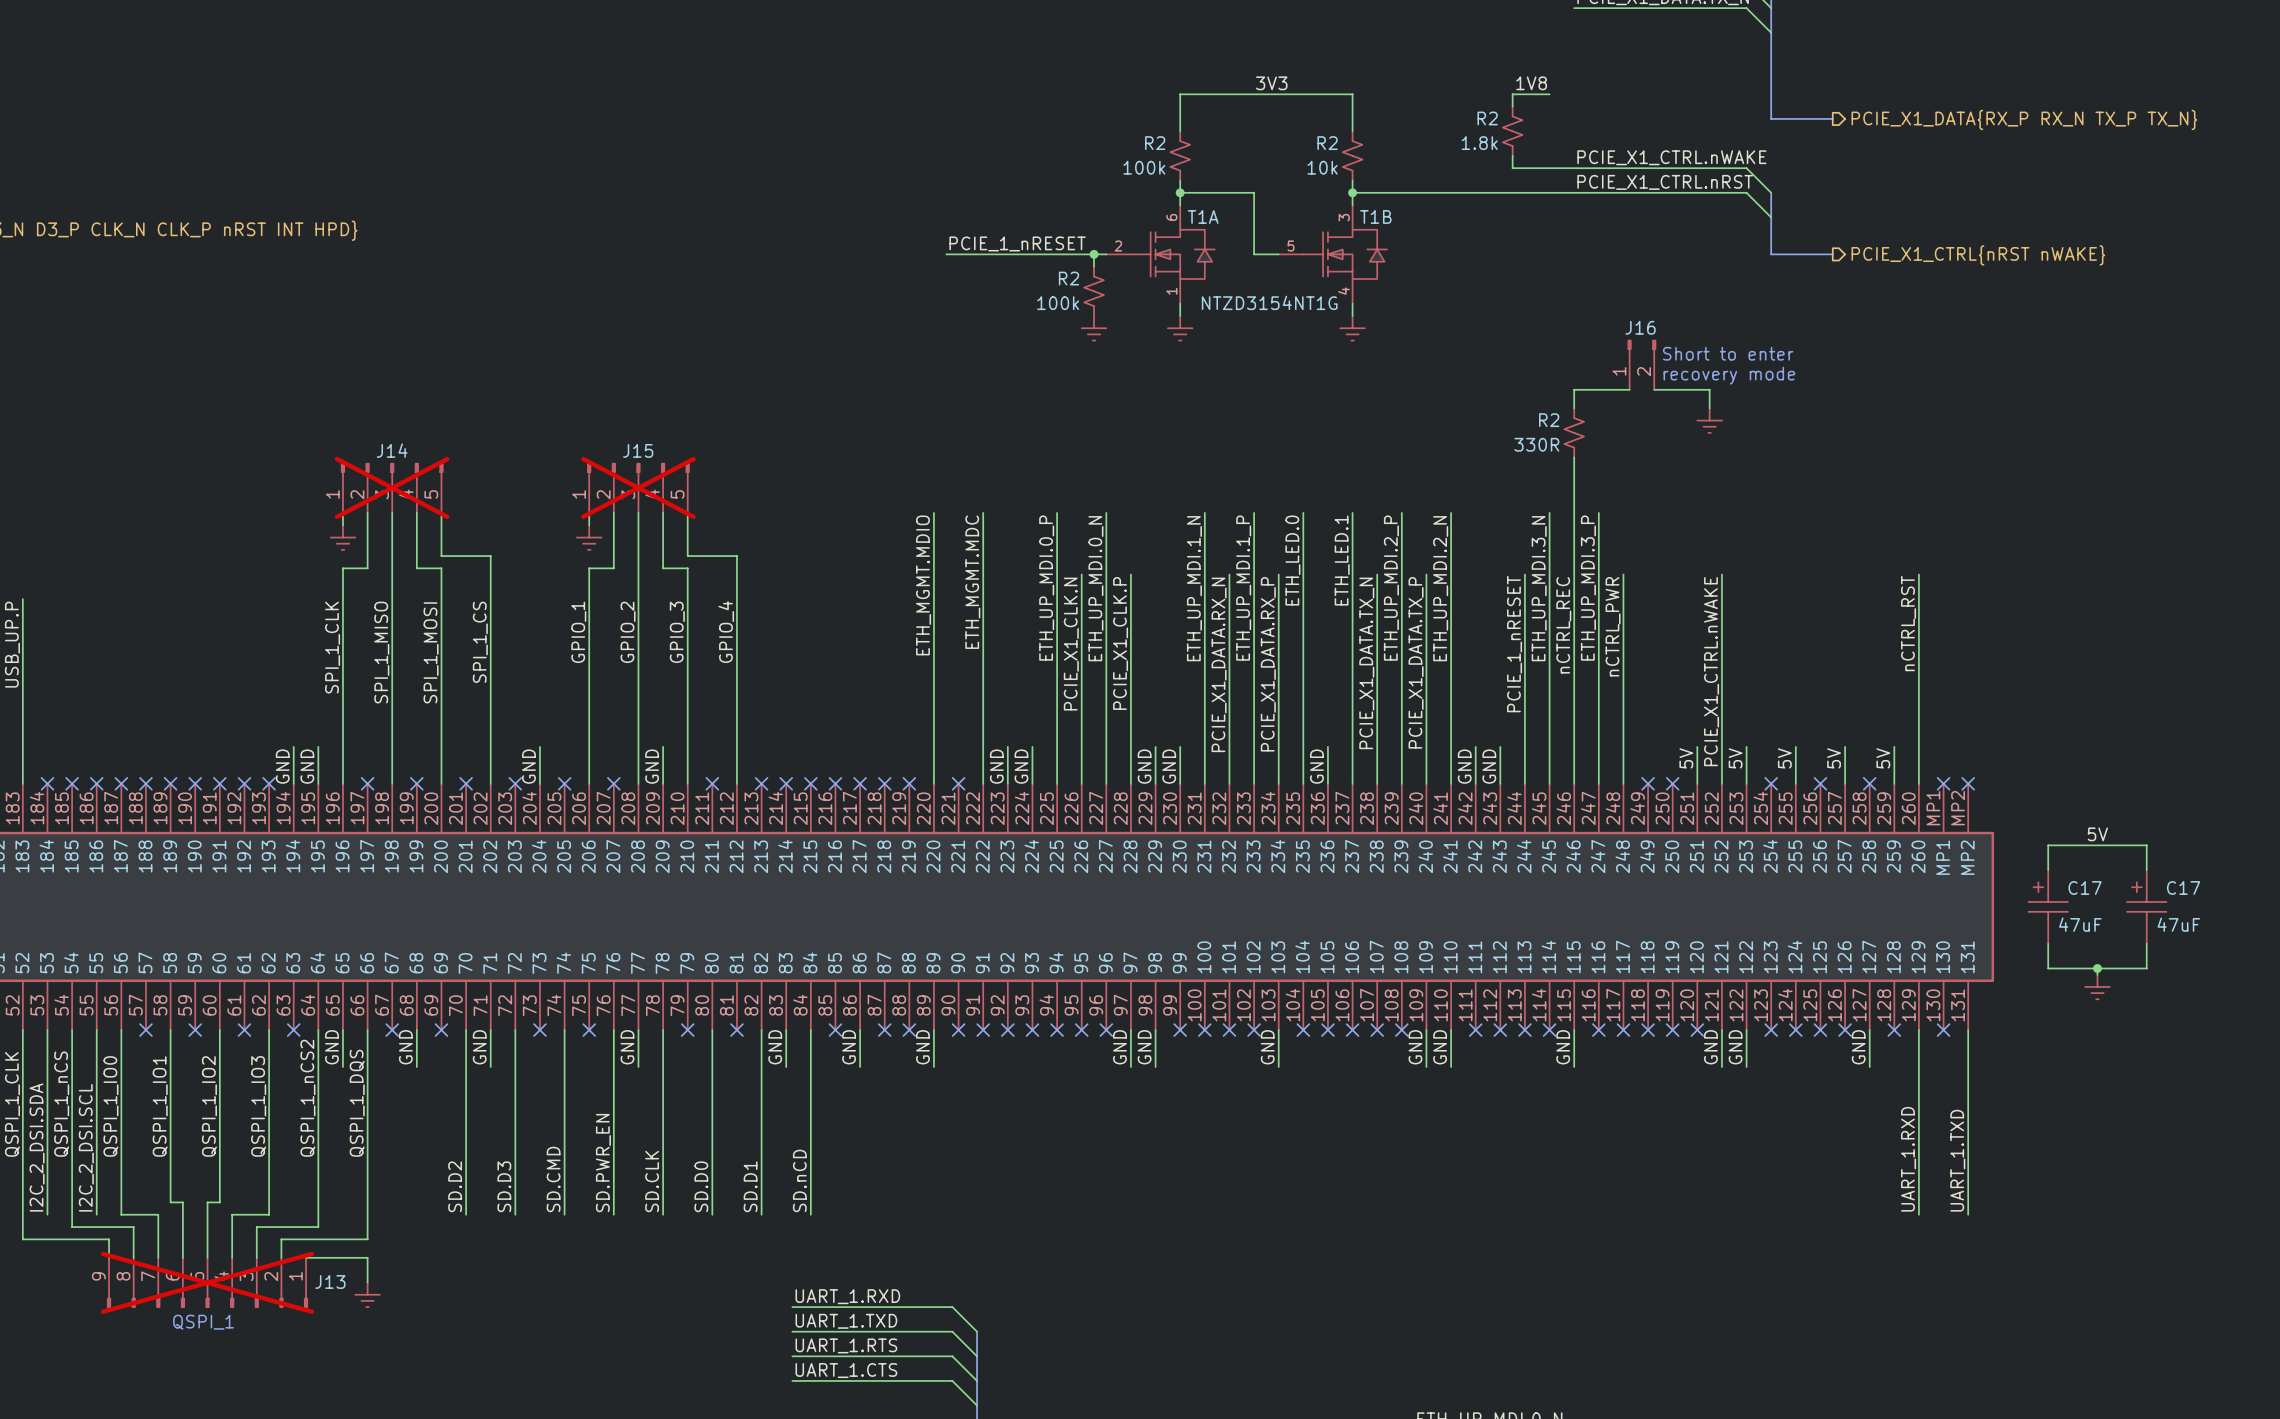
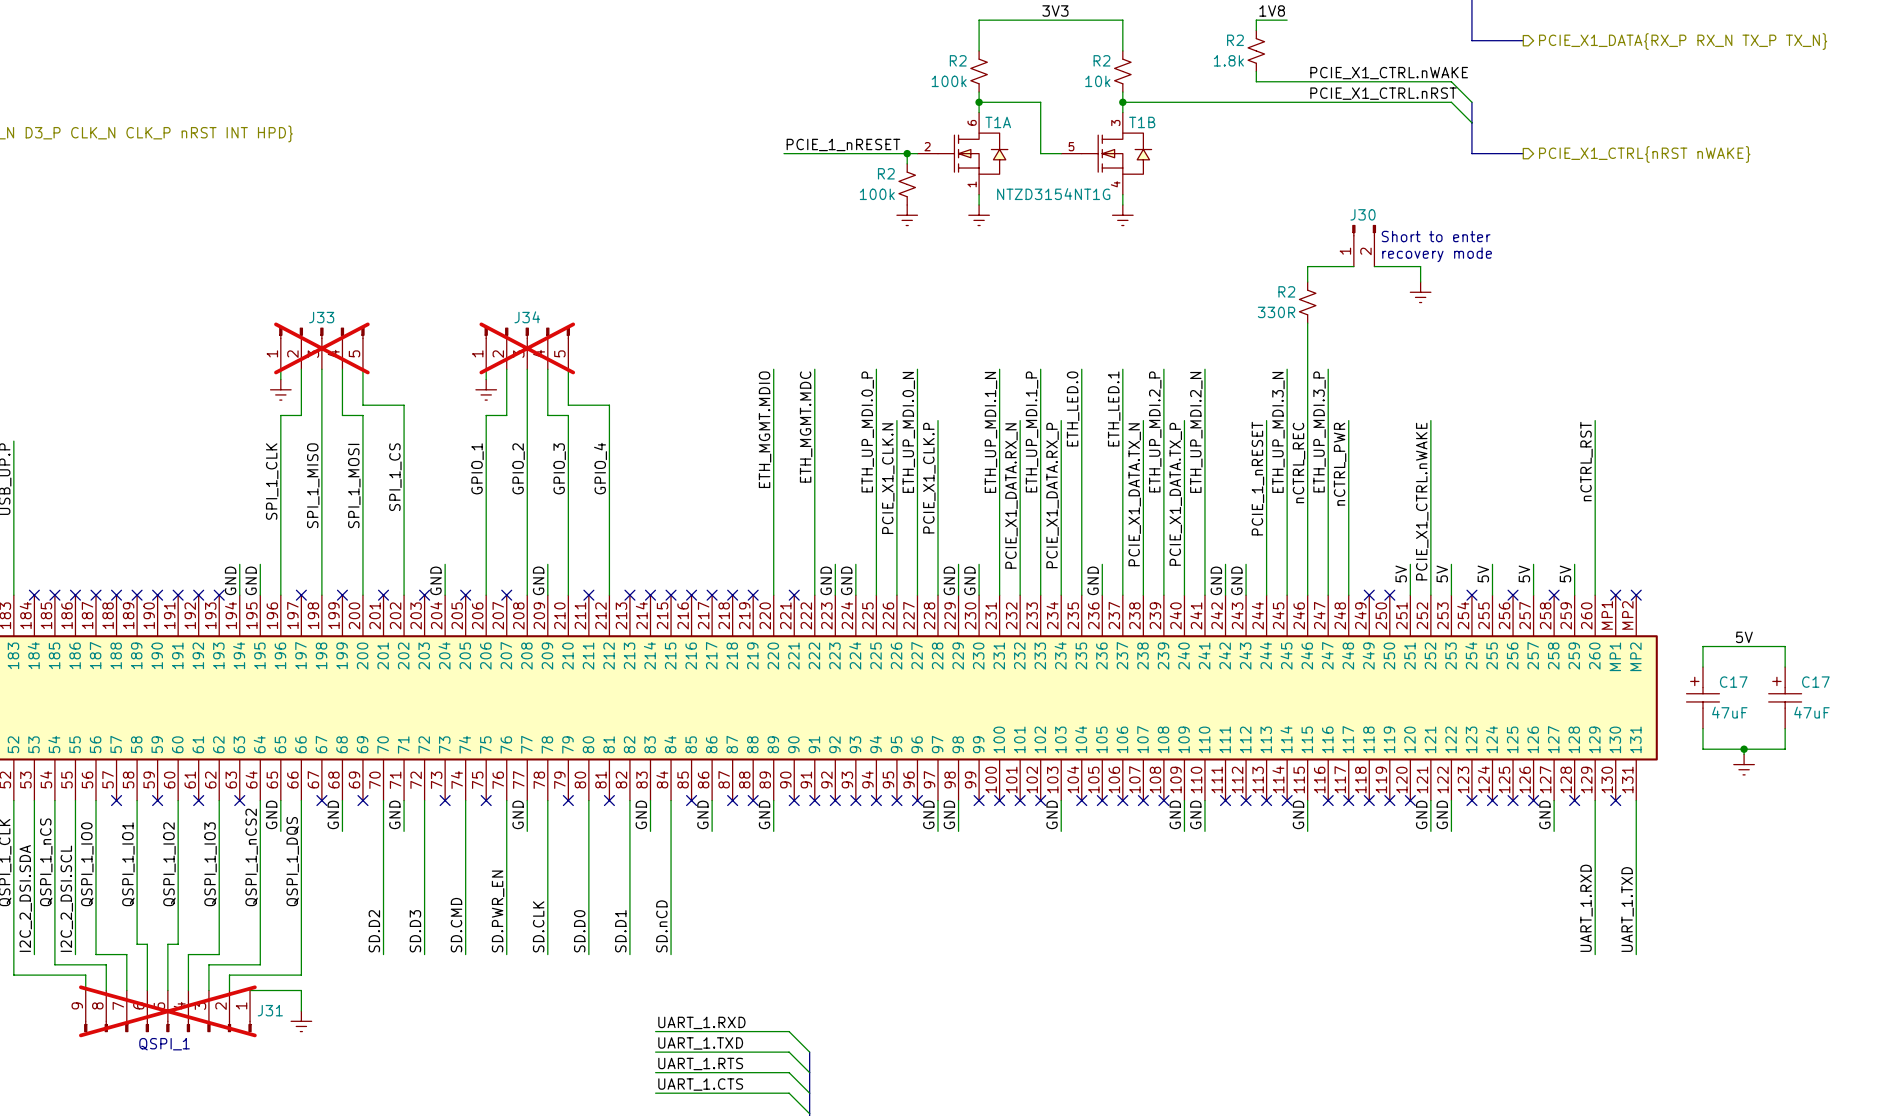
J16 name: J16 (1640, 327) -> J30 (1362, 214)
J14 name: J14 (392, 450) -> J33 (321, 317)
J15 name: J15 (638, 450) -> J34 (527, 317)
J13 name: J13 (330, 1281) -> J31 (270, 1010)

